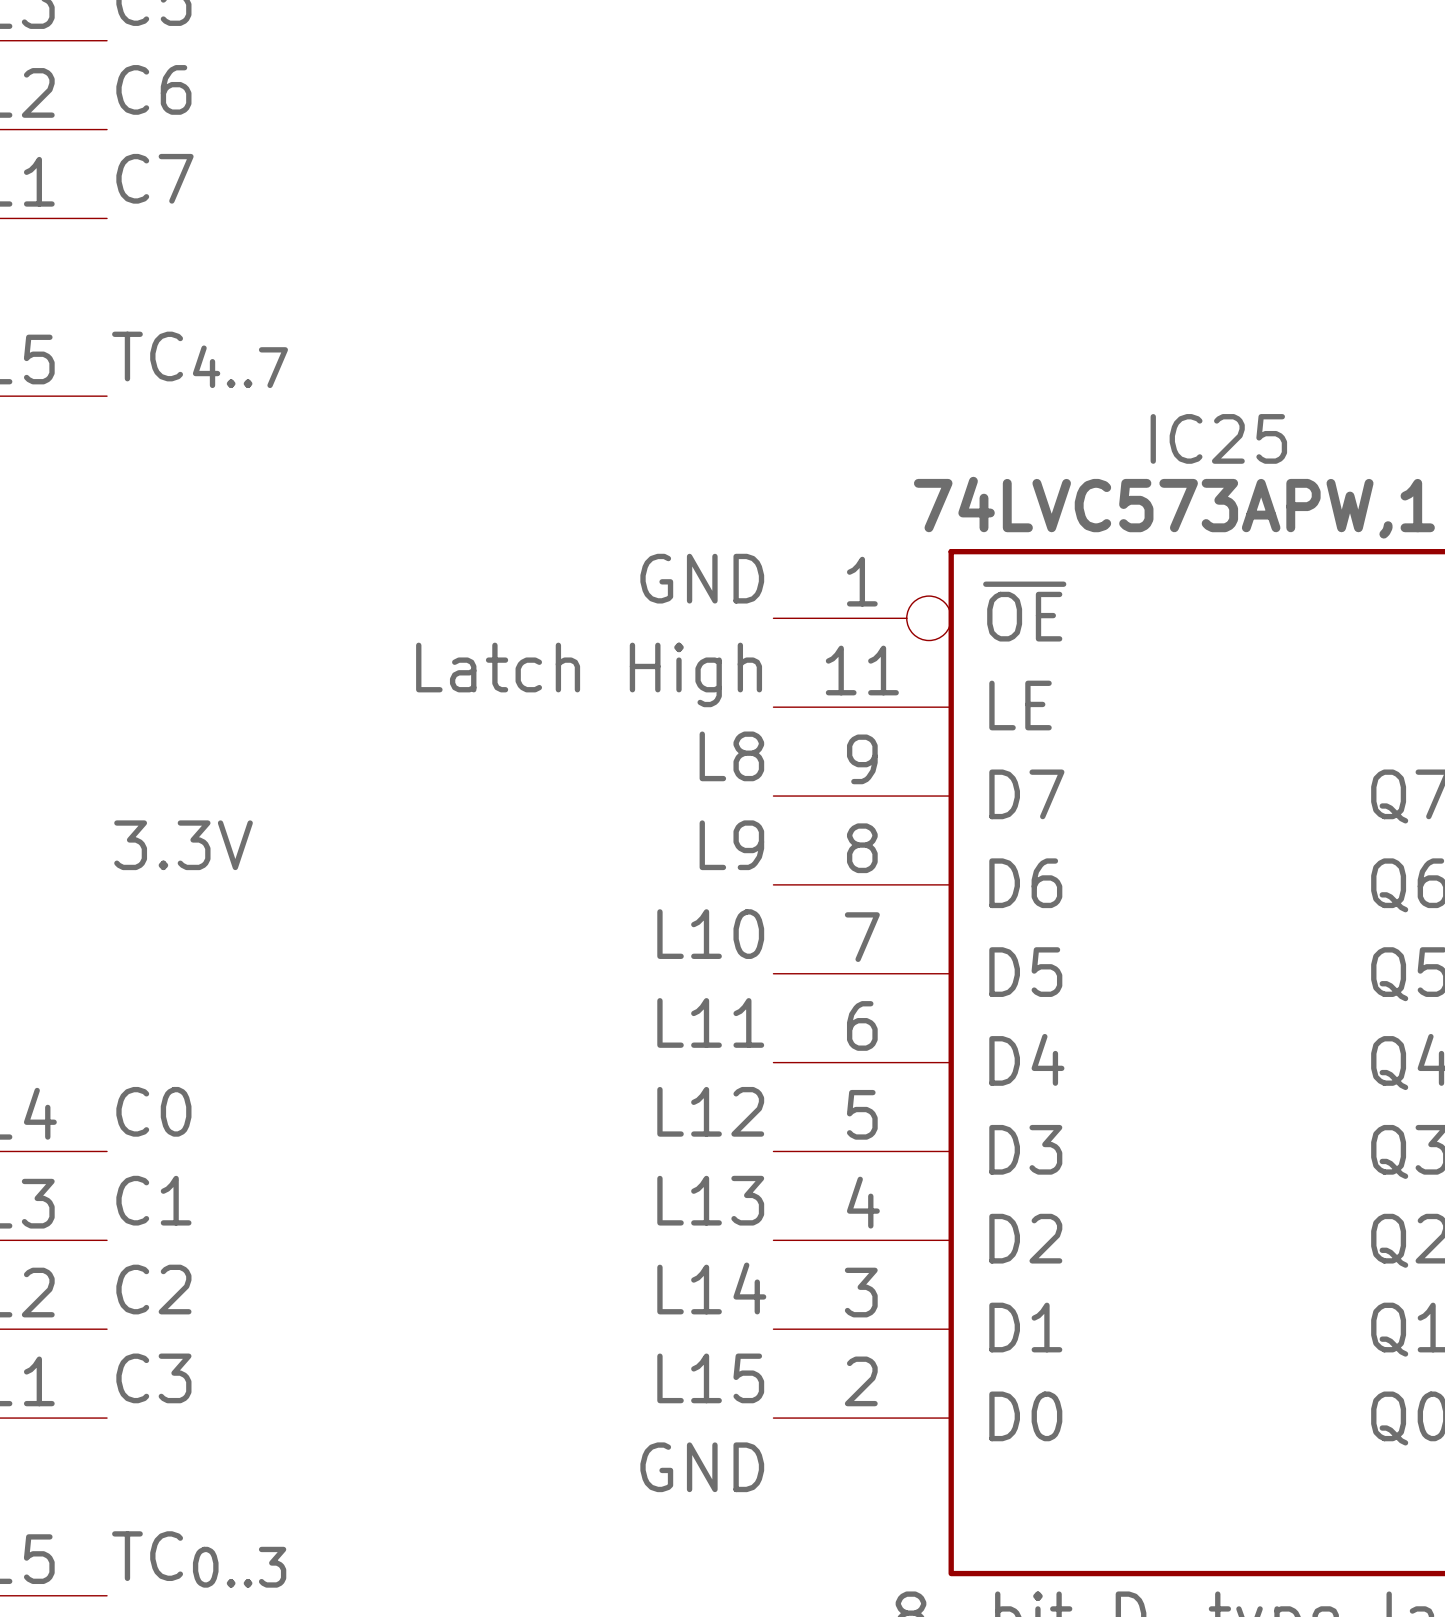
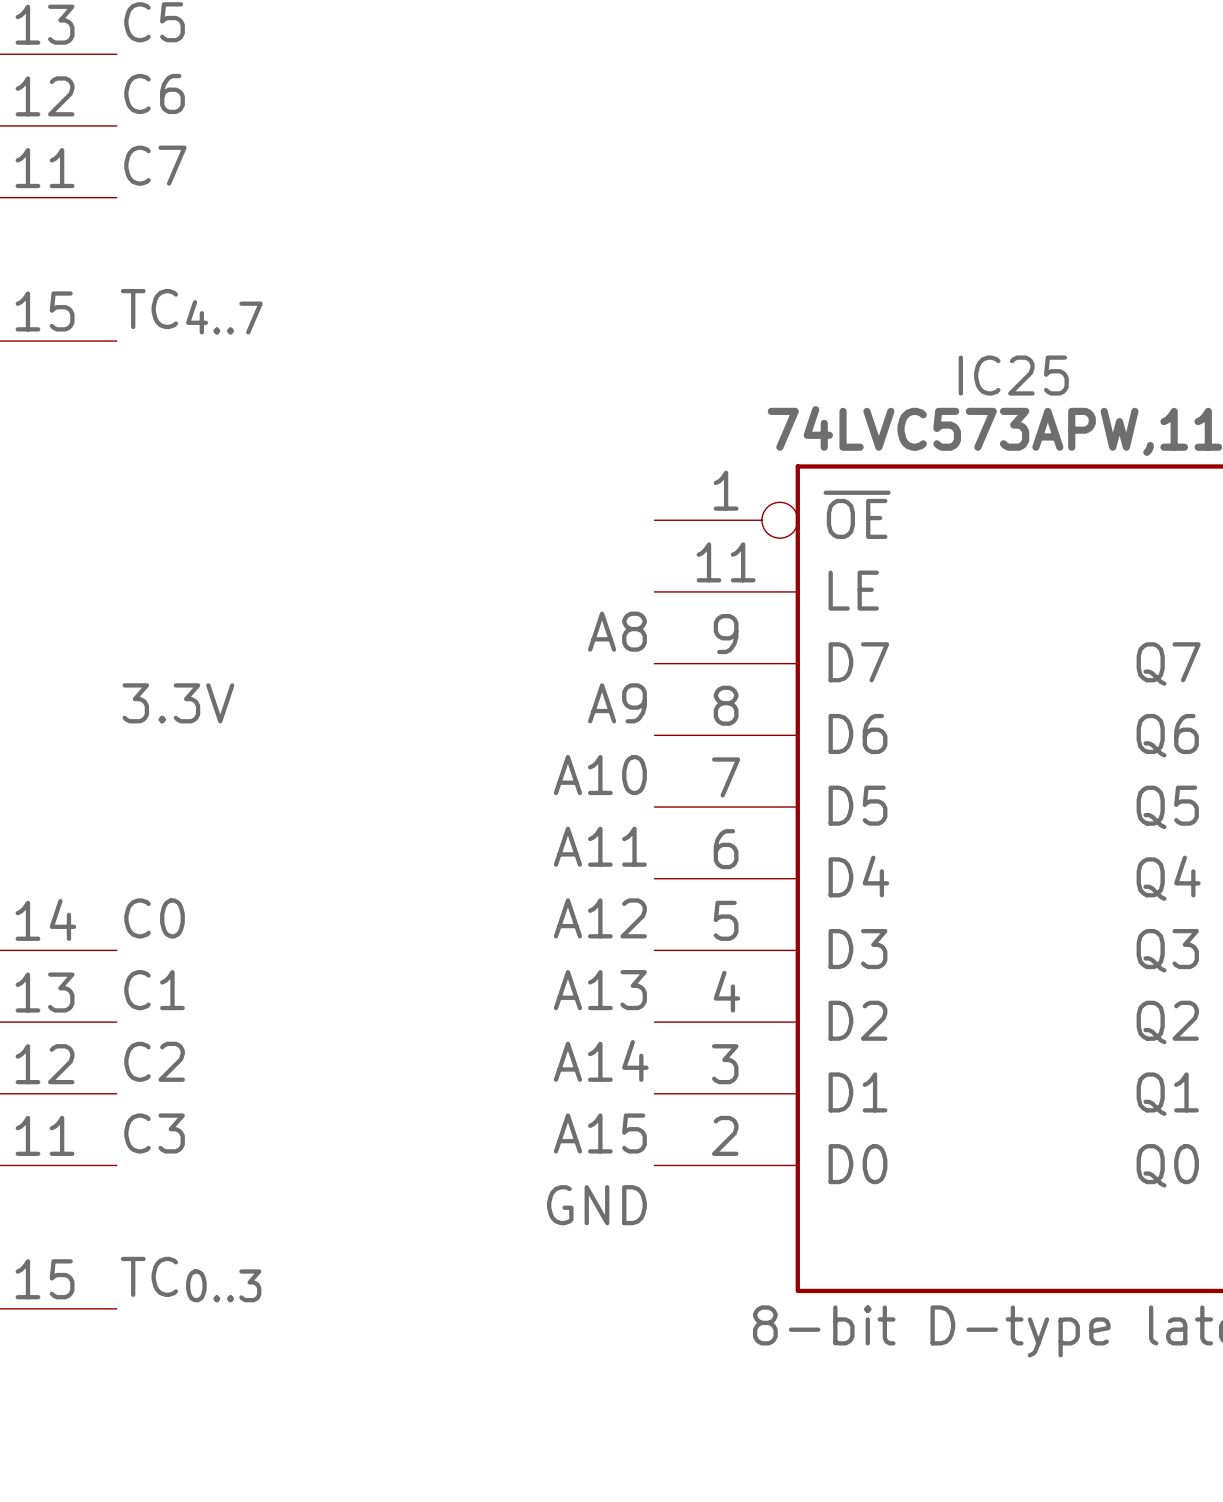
label: GND (702, 578) -> none
label: Latch High (589, 674) -> none
label: L8 (731, 756) -> A8 (617, 631)
label: L9 (731, 845) -> A9 (617, 703)
label: L10 (710, 934) -> A10 (600, 775)
label: L11 (710, 1022) -> A11 (600, 846)
label: L12 (710, 1111) -> A12 (600, 918)
label: L13 (710, 1200) -> A13 (600, 990)
label: L14 (711, 1288) -> A14 (601, 1060)
label: L15 (710, 1378) -> A15 (600, 1133)

